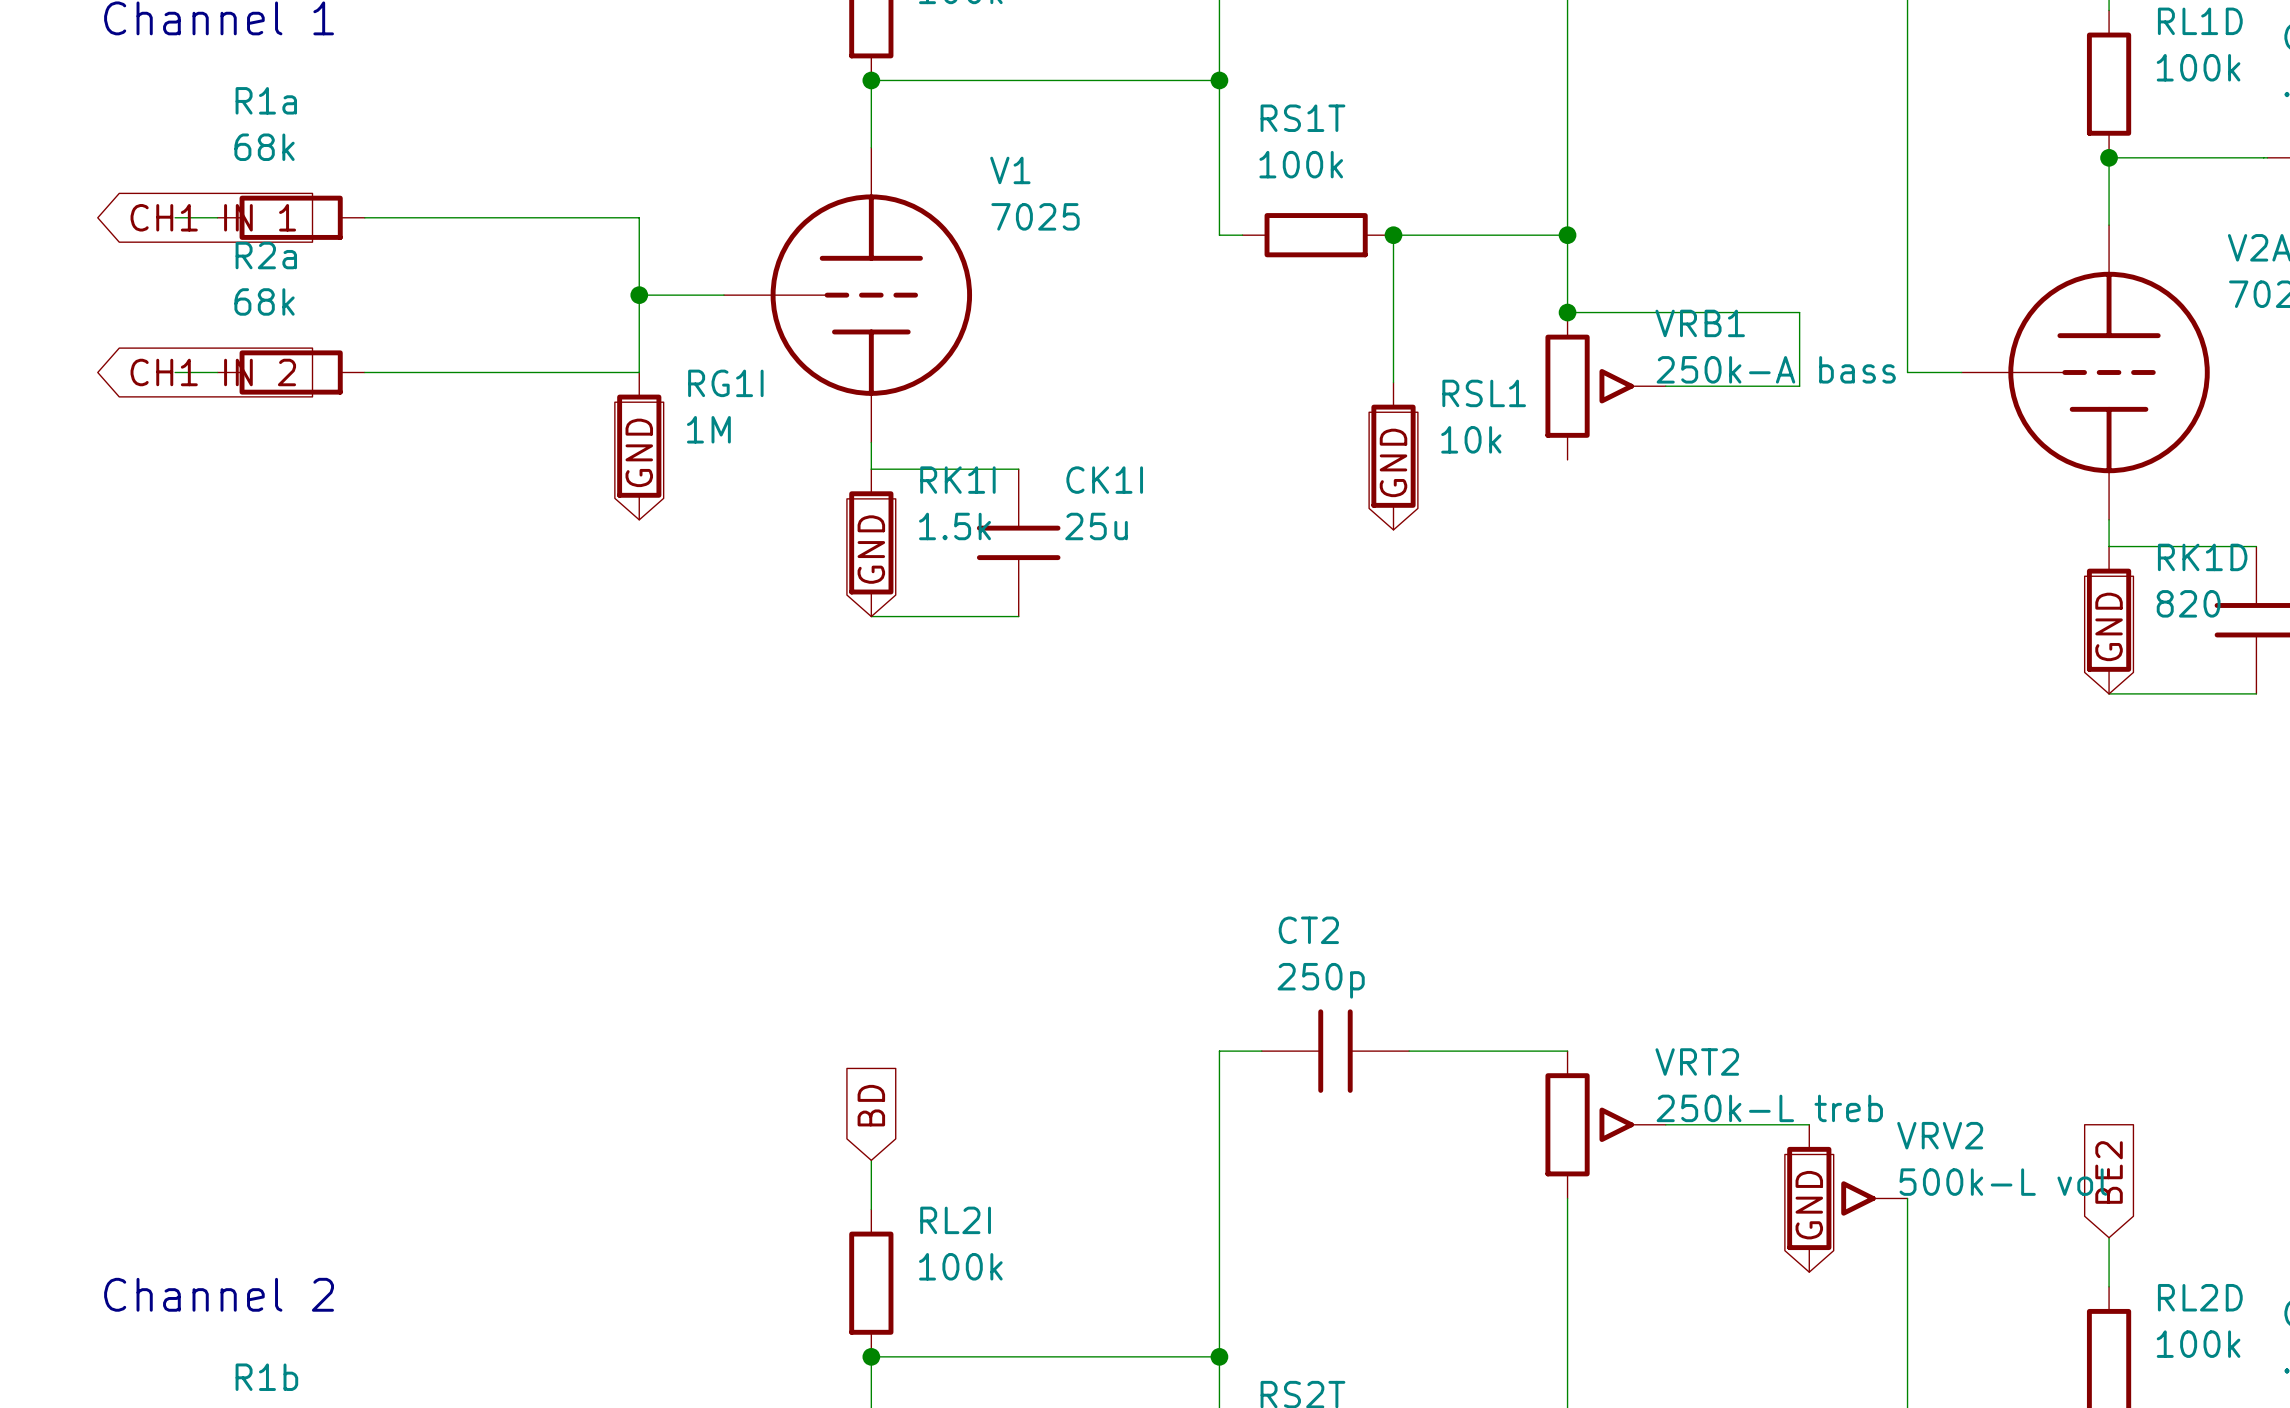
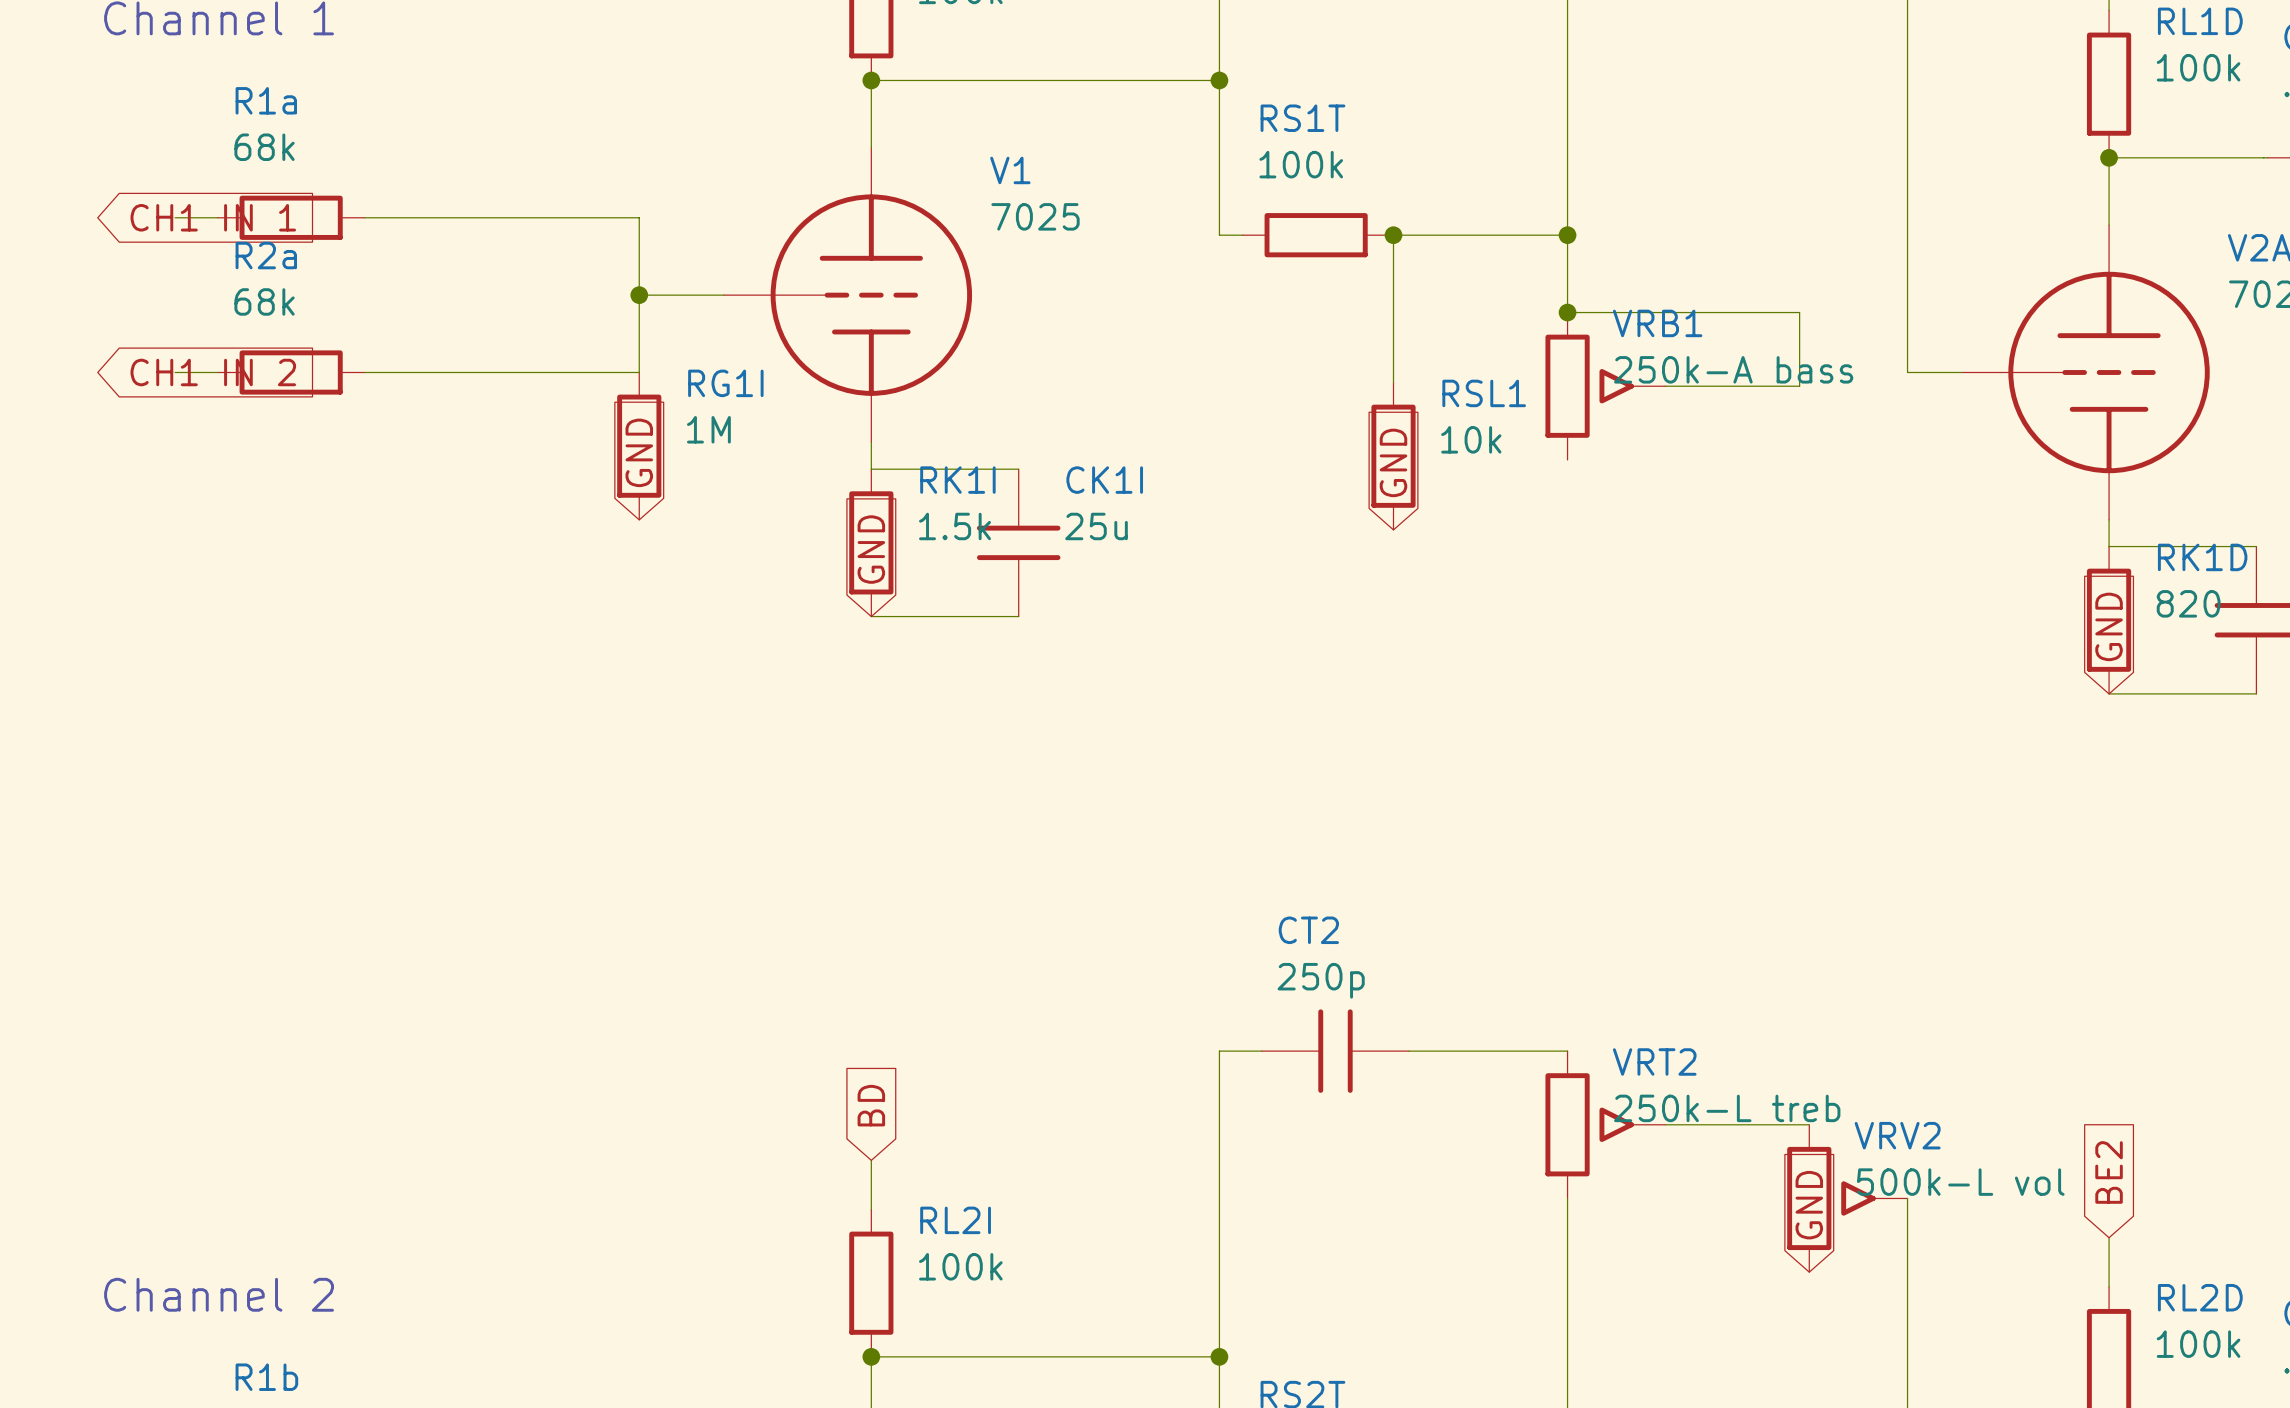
VRB1 name position: VRB1 (1700, 323) -> VRB1 (1657, 323)
VRB1 value position: 250k-A bass (1776, 369) -> 250k-A bass (1733, 369)
VRT2 name position: VRT2 (1697, 1061) -> VRT2 (1654, 1061)
VRT2 value position: 250k-L treb (1769, 1108) -> 250k-L treb (1727, 1108)
VRV2 name position: VRV2 (1940, 1135) -> VRV2 (1897, 1135)
VRV2 value position: 500k-L vol (2003, 1182) -> 500k-L vol (1960, 1182)

